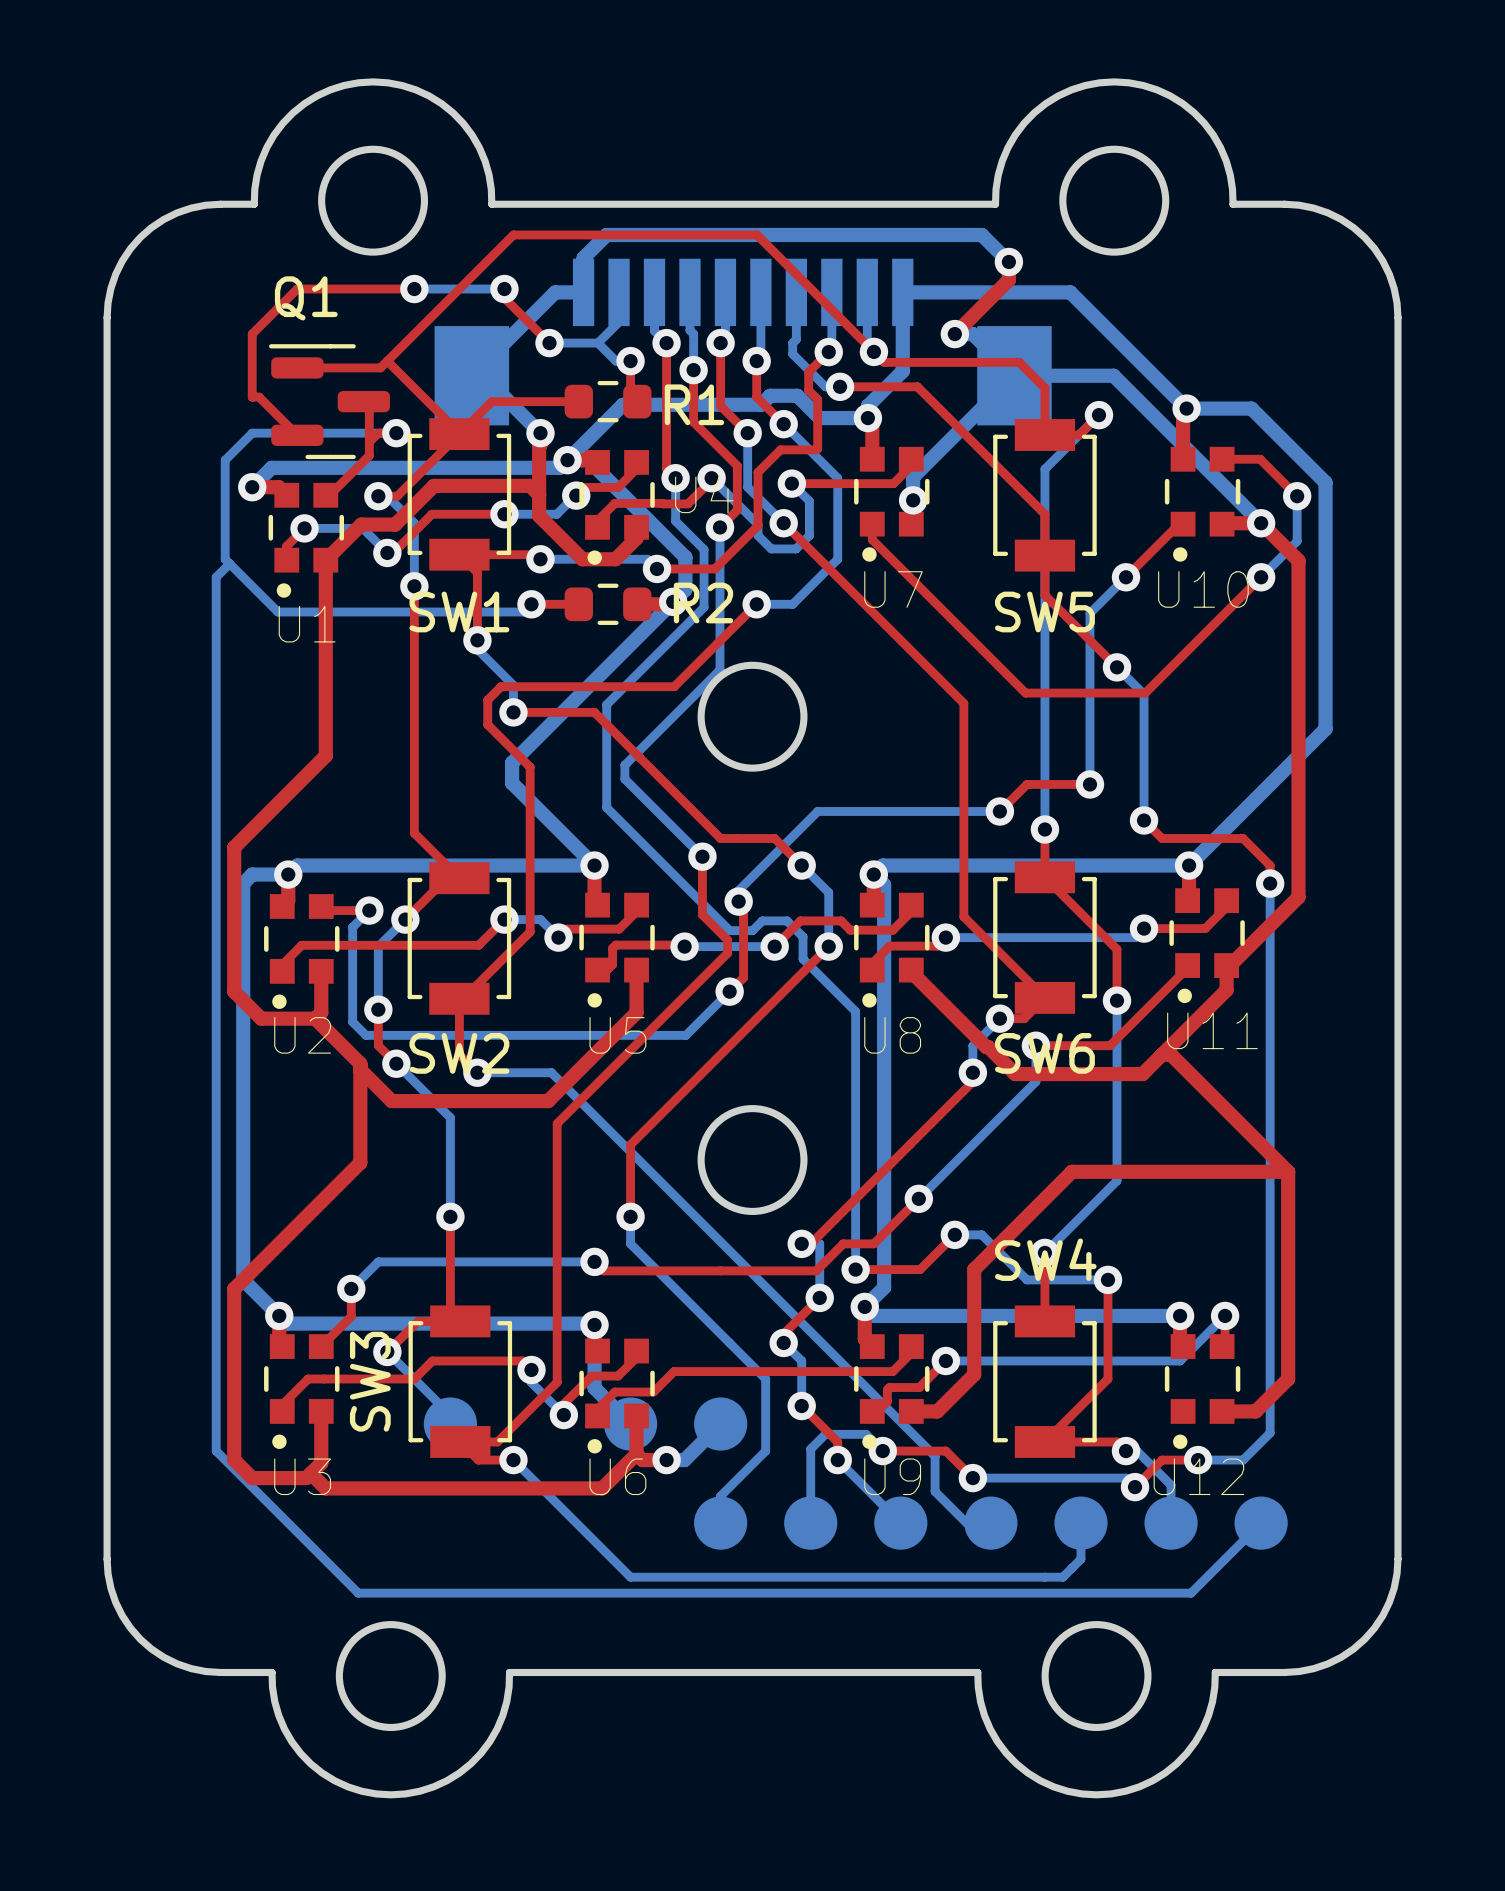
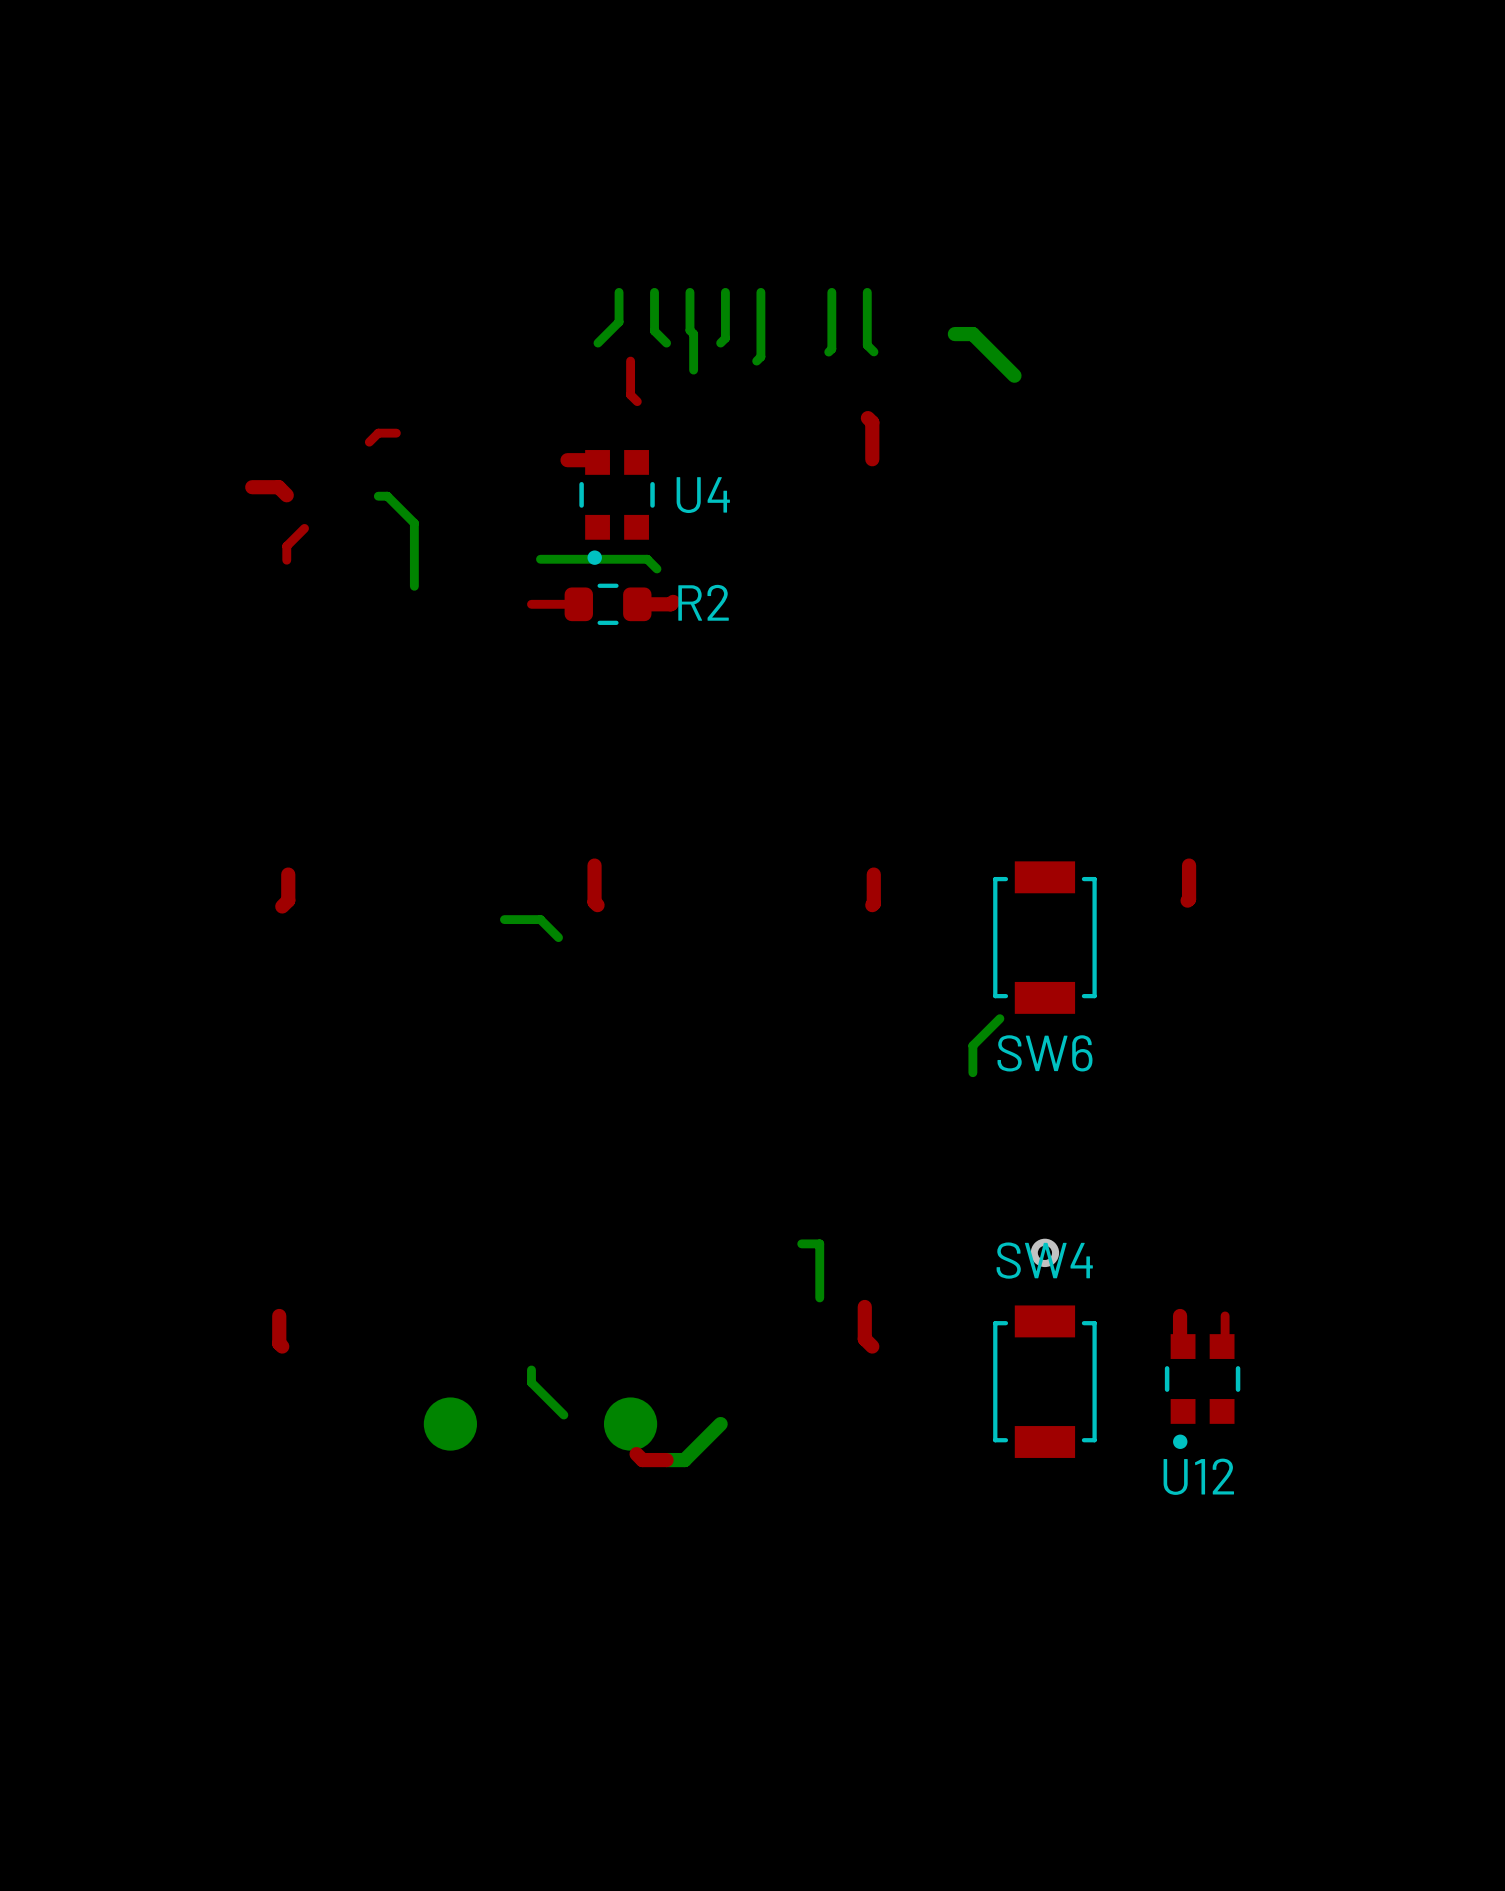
round board edge: [318, 145, 429, 256] -> none
round board edge: [1059, 145, 1170, 256] -> none
board edge: (220, 204) (254, 204) (257, 175) (266, 147) (282, 123) (304, 103) (316, 96) (344, 85) (373, 81) (402, 85) (415, 89) (429, 96) (453, 112) (472, 135) (485, 161) (491, 189) (491, 204) (995, 204) (995, 189) (1002, 161) (1007, 147) (1024, 123) (1045, 103) (1071, 89) (1085, 85) (1114, 81) (1143, 85) (1170, 96) (1182, 103) (1204, 123) (1213, 135) (1226, 161) (1232, 189) (1233, 204) (1284, 204) (1313, 208) (1341, 219) (1364, 237) (1374, 248) (1382, 260) (1394, 288) (1397, 317) (1397, 1559) (1394, 1588) (1382, 1615) (1364, 1639) (1353, 1649) (1327, 1663) (1299, 1671) (1215, 1672) (1212, 1701) (1208, 1715) (1195, 1741) (1186, 1753) (1176, 1763) (1152, 1780) (1125, 1791) (1111, 1793) (1081, 1793) (1053, 1786) (1040, 1780) (1016, 1763) (997, 1741) (984, 1715) (978, 1687) (977, 1672) (509, 1672) (506, 1701) (497, 1729) (480, 1753) (470, 1763) (446, 1780) (433, 1786) (419, 1791) (390, 1794) (361, 1791) (334, 1780) (310, 1763) (300, 1753) (291, 1741) (278, 1715) (272, 1687) (272, 1672) (220, 1672) (191, 1668) (163, 1657) (140, 1639) (130, 1628) (115, 1602) (110, 1588) (107, 1559) (107, 317) (108, 302) (115, 274) (122, 260) (140, 237) (151, 227) (177, 212) (191, 208) (220, 204) -> none
top track: (1008, 262) (1008, 280) (954, 334) -> none
bottom track: (1008, 262) (981, 234) (606, 234) (583, 257) (583, 292) (555, 292) (471, 375) (483, 375) (540, 433) -> none
via: (1008, 262) -> none
top track: (414, 289) (297, 289) (252, 334) (252, 397) (259, 397) (297, 435) -> none
bottom track: (414, 289) (504, 289) -> none
via: (414, 289) -> none
top track: (504, 289) (504, 298) (549, 343) -> none
via: (504, 289) -> none
bottom track: (796, 292) (796, 339) (792, 343) (792, 354) (825, 386) (840, 386) -> none
via: (954, 334) -> none
part: (743, 342) -> none
bottom track: (549, 343) (597, 343) (615, 361) (630, 361) -> none
via: (549, 343) -> none
top track: (666, 343) (666, 469) (675, 478) -> none
via: (666, 343) -> none
top track: (720, 343) (720, 406) (747, 433) -> none
via: (720, 343) -> none
via: (873, 351) -> none
top track: (828, 352) (808, 372) (808, 390) (817, 399) (817, 448) (780, 449) (757, 472) (757, 525) (714, 568) (656, 568) -> none
via: (828, 352) -> none
top track: (387, 361) (459, 434) -> none
via: (630, 361) -> none
top track: (756, 361) (756, 397) (783, 424) -> none
via: (756, 361) -> none
top track: (297, 367) (380, 367) (513, 234) (757, 234) (884, 362) (1019, 362) (1044, 388) (1044, 435) (1079, 435) (1098, 415) -> none
top track: (693, 370) (693, 422) (737, 465) (737, 510) (720, 527) -> none
via: (693, 370) -> none
top track: (840, 386) (917, 386) (1044, 514) (1044, 595) (1117, 667) -> none
via: (840, 386) -> none
Q1: (329, 401) -> none
top track: (363, 401) (369, 407) (369, 455) (329, 495) (325, 495) -> none
top track: (578, 401) (491, 401) (397, 496) (378, 496) -> none
R1: (608, 401) -> none
top track: (1186, 408) (1183, 412) (1183, 459) -> none
via: (1186, 408) -> none
bottom track: (1098, 415) (1044, 469) (1044, 829) -> none
via: (1098, 415) -> none
via: (867, 418) -> none
bottom track: (783, 424) (837, 478) (837, 559) (792, 604) (756, 604) -> none
via: (783, 424) -> none
bottom track: (396, 433) (252, 433) (225, 460) (225, 559) (277, 612) (523, 612) (531, 604) -> none
via: (396, 433) -> none
top track: (540, 433) (539, 515) (582, 559) (615, 559) (636, 538) (636, 527) -> none
via: (540, 433) -> none
bottom track: (747, 433) (747, 487) (783, 523) -> none
via: (747, 433) -> none
top track: (911, 459) (911, 465) (893, 483) (791, 483) -> none
top track: (1222, 459) (1260, 459) (1297, 496) -> none
bottom track: (567, 460) (588, 460) (685, 557) (685, 589) (512, 762) (512, 783) (594, 865) (297, 865) (288, 874) (252, 874) (243, 883) (243, 1279) (286, 1323) (593, 1323) (594, 1388) (630, 1424) -> none
via: (567, 460) -> none
top track: (636, 462) (636, 468) (618, 487) (584, 487) (576, 495) -> none
bottom track: (675, 478) (675, 521) (704, 549) (704, 607) (606, 704) (606, 807) (729, 930) (752, 930) (762, 920) (787, 920) (803, 936) (803, 958) (855, 1011) (855, 1269) -> none
via: (675, 478) -> none
top track: (711, 478) (687, 503) (614, 503) (597, 520) (597, 527) -> none
bottom track: (711, 478) (757, 524) (757, 535) (771, 548) (796, 548) (809, 535) (809, 501) (791, 483) -> none
via: (711, 478) -> none
via: (791, 483) -> none
bottom track: (252, 487) (271, 467) (559, 467) (622, 404) (761, 404) (770, 395) (797, 395) (819, 418) (867, 418) (867, 406) (902, 371) (902, 292) (1070, 292) (1186, 408) (1251, 408) (1325, 482) (1325, 729) (1189, 865) (882, 865) (873, 874) (884, 884) (884, 1287) (864, 1306) (873, 1315) (1180, 1315) -> none
via: (252, 487) -> none
SW1: (459, 494) -> none
top track: (539, 494) (530, 485) (434, 485) (395, 524) (361, 524) (325, 560) (325, 755) (234, 847) (234, 991) (261, 1018) (315, 1018) -> none
bottom track: (575, 495) (556, 514) (504, 514) -> none
via: (576, 495) -> none
SW5: (1044, 495) -> none
via: (378, 496) -> none
bottom track: (1297, 496) (1297, 541) (1261, 577) -> none
via: (1297, 496) -> none
bottom track: (913, 500) (913, 477) (1014, 375) (1113, 375) (1261, 523) -> none
via: (913, 500) -> none
U7: (891, 504) -> none
U10: (1202, 504) -> none
top track: (504, 514) (431, 514) (393, 552) (387, 552) -> none
via: (504, 514) -> none
top track: (783, 523) (963, 703) (963, 916) (1044, 997) (1024, 1018) (999, 1018) -> none
via: (783, 523) -> none
via: (1261, 523) -> none
top track: (872, 524) (872, 539) (1025, 693) (1145, 693) (1261, 577) -> none
top track: (1183, 524) (1179, 524) (1126, 577) -> none
top track: (1222, 524) (1261, 523) (1298, 560) (1298, 897) (1230, 965) (1226, 965) (1226, 990) (1142, 1074) (1015, 1074) (911, 970) -> none
bottom track: (720, 527) (720, 670) (624, 765) (624, 779) (702, 856) -> none
via: (720, 527) -> none
bottom track: (304, 528) (362, 528) (387, 552) -> none
via: (304, 528) -> none
U1: (306, 540) -> none
via: (387, 552) -> none
top track: (540, 559) (535, 554) (459, 554) (477, 572) (477, 640) -> none
via: (540, 559) -> none
bottom track: (229, 563) (216, 577) (216, 1451) (358, 1593) (1191, 1593) (1261, 1523) (1261, 1532) -> none
via: (656, 568) -> none
bottom track: (1126, 577) (1089, 613) (1089, 784) -> none
via: (1126, 577) -> none
via: (1261, 577) -> none
top track: (414, 586) (414, 833) (459, 878) (446, 878) (405, 919) -> none
via: (414, 586) -> none
via: (673, 601) -> none
via: (531, 604) -> none
top track: (756, 604) (674, 686) (501, 686) (487, 700) (487, 724) (530, 767) (530, 931) (463, 998) (459, 998) (459, 1054) (477, 1072) -> none
via: (756, 604) -> none
bottom track: (477, 640) (477, 649) (513, 685) (513, 712) -> none
via: (477, 640) -> none
round board edge: [697, 661, 808, 772] -> none
bottom track: (1117, 667) (1144, 694) (1144, 820) -> none
via: (1117, 667) -> none
top track: (513, 712) (594, 712) (720, 838) (774, 838) (801, 865) -> none
via: (513, 712) -> none
top track: (1089, 784) (1026, 784) (999, 811) -> none
via: (1089, 784) -> none
bottom track: (999, 811) (817, 811) (738, 890) (738, 901) -> none
via: (999, 811) -> none
top track: (1144, 820) (1162, 838) (1243, 838) (1270, 865) (1270, 883) -> none
via: (1144, 820) -> none
top track: (1044, 829) (1044, 877) (1117, 949) (1117, 1000) -> none
via: (1044, 829) -> none
top track: (702, 856) (702, 914) (727, 940) (727, 953) (557, 1123) (557, 1382) (497, 1441) (460, 1441) (478, 1460) (513, 1460) -> none
via: (702, 856) -> none
via: (594, 865) -> none
bottom track: (801, 865) (828, 892) (828, 946) -> none
via: (801, 865) -> none
via: (1189, 865) -> none
via: (288, 874) -> none
via: (873, 874) -> none
bottom track: (1270, 883) (1270, 1433) (1243, 1460) (1198, 1460) -> none
via: (1270, 883) -> none
top track: (1226, 900) (1226, 907) (1205, 928) (1144, 928) -> none
top track: (738, 901) (743, 906) (743, 977) (729, 991) -> none
via: (738, 901) -> none
top track: (636, 905) (636, 911) (619, 929) (567, 929) (558, 937) -> none
top track: (911, 905) (911, 911) (892, 930) (850, 930) (841, 920) (800, 920) (774, 946) -> none
top track: (321, 906) (325, 910) (369, 910) -> none
bottom track: (369, 910) (352, 927) (352, 1022) (366, 1035) (685, 1035) (729, 991) -> none
via: (369, 910) -> none
bottom track: (405, 919) (378, 946) (378, 1009) -> none
via: (405, 919) -> none
top track: (504, 919) (478, 945) (301, 945) (282, 964) (282, 971) -> none
via: (504, 919) -> none
bottom track: (1144, 928) (1135, 937) (945, 937) -> none
via: (1144, 928) -> none
via: (558, 937) -> none
top track: (945, 937) (937, 946) (889, 946) (872, 963) (872, 970) -> none
via: (945, 937) -> none
SW2: (459, 938) -> none
U11: (1207, 945) -> none
top track: (684, 946) (683, 945) (615, 945) (612, 948) (612, 964) (607, 970) (597, 970) -> none
bottom track: (684, 946) (774, 946) -> none
via: (684, 946) -> none
via: (774, 946) -> none
top track: (828, 946) (630, 1144) (630, 1216) -> none
via: (828, 946) -> none
U5: (617, 950) -> none
U8: (891, 950) -> none
U2: (301, 951) -> none
top track: (1187, 965) (1187, 968) (1110, 1045) (1035, 1045) -> none
top track: (636, 970) (636, 1012) (548, 1101) (391, 1101) (360, 1069) -> none
top track: (321, 971) (321, 1012) (315, 1018) -> none
via: (729, 991) -> none
bottom track: (1117, 1000) (1117, 1180) (1044, 1252) -> none
via: (1117, 1000) -> none
top track: (378, 1009) (378, 1045) (396, 1063) -> none
via: (378, 1009) -> none
top track: (315, 1018) (360, 1063) (360, 1162) (234, 1288) (234, 1460) (252, 1478) (306, 1478) (321, 1463) (321, 1411) -> none
via: (999, 1018) -> none
bottom track: (1035, 1045) (1035, 1081) (918, 1198) -> none
via: (1035, 1045) -> none
top track: (1162, 1054) (1171, 1054) (1288, 1171) -> none
bottom track: (396, 1063) (450, 1117) (450, 1216) -> none
via: (396, 1063) -> none
bottom track: (477, 1072) (551, 1072) (935, 1456) (935, 1491) (966, 1523) (990, 1523) -> none
via: (477, 1072) -> none
top track: (972, 1072) (972, 1081) (810, 1243) (801, 1243) -> none
via: (972, 1072) -> none
round board edge: [697, 1105, 808, 1215] -> none
top track: (1288, 1171) (1071, 1171) (974, 1269) (974, 1374) (937, 1411) (911, 1411) -> none
top track: (1288, 1171) (1288, 1379) (1255, 1411) (1222, 1411) -> none
top track: (918, 1198) (873, 1243) (843, 1243) (816, 1270) (603, 1270) (594, 1261) -> none
via: (918, 1198) -> none
top track: (450, 1216) (450, 1311) (460, 1321) (417, 1321) (387, 1351) -> none
via: (450, 1216) -> none
bottom track: (630, 1216) (630, 1243) (765, 1379) (765, 1451) (720, 1496) (720, 1523) -> none
via: (630, 1216) -> none
top track: (954, 1234) (920, 1269) (855, 1269) -> none
bottom track: (954, 1234) (981, 1234) (1026, 1279) (1108, 1279) -> none
via: (954, 1234) -> none
via: (801, 1243) -> none
top track: (1044, 1252) (1044, 1321) -> none
bottom track: (594, 1261) (378, 1261) (351, 1288) -> none
via: (594, 1261) -> none
via: (855, 1269) -> none
top track: (1108, 1279) (1108, 1378) (1044, 1441) (1116, 1441) (1126, 1451) -> none
via: (1108, 1279) -> none
top track: (351, 1288) (351, 1316) (321, 1346) -> none
via: (351, 1288) -> none
top track: (819, 1297) (783, 1333) (783, 1342) -> none
via: (819, 1297) -> none
via: (864, 1306) -> none
via: (279, 1315) -> none
via: (1180, 1315) -> none
bottom track: (1225, 1315) (1180, 1360) (945, 1360) -> none
via: (1225, 1315) -> none
via: (594, 1324) -> none
bottom track: (783, 1342) (801, 1360) (801, 1406) -> none
via: (783, 1342) -> none
top track: (911, 1346) (911, 1353) (892, 1371) (674, 1371) (653, 1392) (614, 1392) (597, 1409) (597, 1415) -> none
bottom track: (387, 1351) (450, 1415) (450, 1424) -> none
via: (387, 1351) -> none
top track: (636, 1351) (636, 1357) (618, 1376) (591, 1376) (563, 1404) (563, 1415) -> none
top track: (945, 1360) (919, 1387) (889, 1387) (887, 1389) (887, 1401) (877, 1411) (872, 1411) -> none
via: (945, 1360) -> none
top track: (531, 1369) (522, 1360) (432, 1360) (414, 1379) (308, 1379) (282, 1404) (282, 1411) -> none
via: (531, 1369) -> none
SW3: (460, 1381) -> none
U3: (301, 1391) -> none
U9: (891, 1391) -> none
U6: (617, 1396) -> none
top track: (801, 1406) (837, 1442) (837, 1460) -> none
via: (801, 1406) -> none
via: (563, 1415) -> none
top track: (636, 1415) (636, 1454) (602, 1488) (325, 1488) (310, 1473) -> none
part: (720, 1424) -> none
top track: (882, 1451) (945, 1451) (972, 1478) -> none
bottom track: (882, 1451) (866, 1434) (825, 1434) (810, 1449) (810, 1523) -> none
via: (882, 1451) -> none
bottom track: (1126, 1451) (1137, 1451) (1171, 1485) (1171, 1523) -> none
via: (1126, 1451) -> none
bottom track: (513, 1460) (630, 1577) (1062, 1577) (1080, 1559) (1080, 1523) -> none
via: (513, 1460) -> none
via: (666, 1460) -> none
bottom track: (837, 1460) (900, 1523) -> none
via: (837, 1460) -> none
top track: (1198, 1460) (1162, 1460) (1135, 1487) -> none
via: (1198, 1460) -> none
bottom track: (972, 1478) (1126, 1478) (1135, 1487) -> none
via: (972, 1478) -> none
via: (1135, 1487) -> none
part: (720, 1523) -> none
part: (810, 1523) -> none
part: (900, 1523) -> none
part: (990, 1523) -> none
part: (1080, 1523) -> none
part: (1171, 1523) -> none
part: (1261, 1523) -> none
round board edge: [335, 1621, 446, 1732] -> none
round board edge: [1041, 1621, 1152, 1732] -> none

